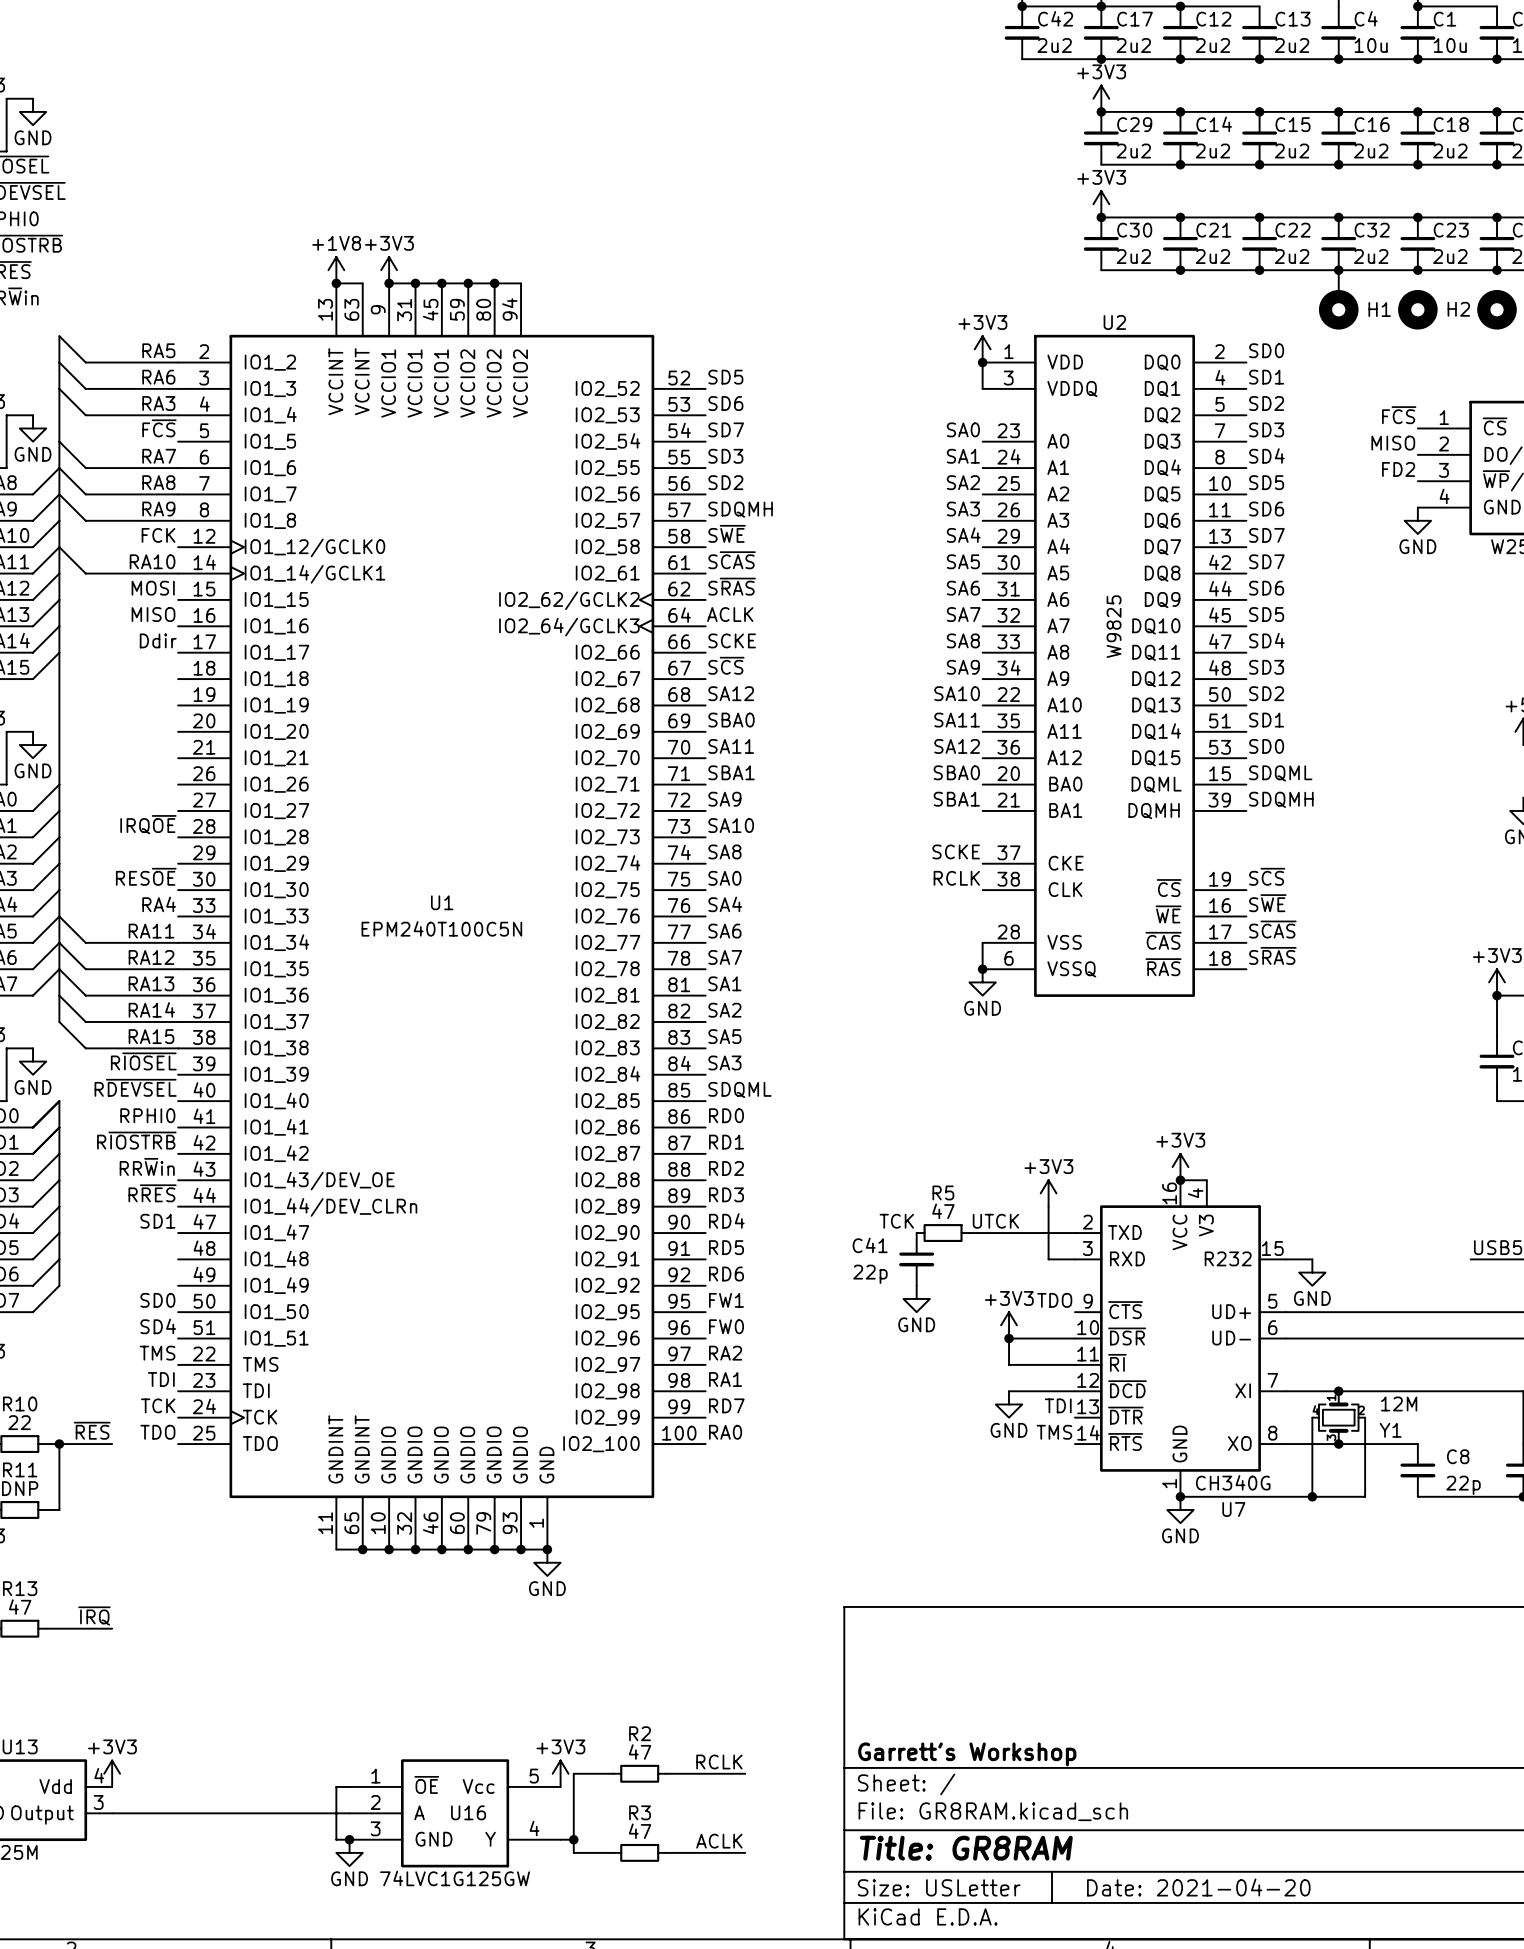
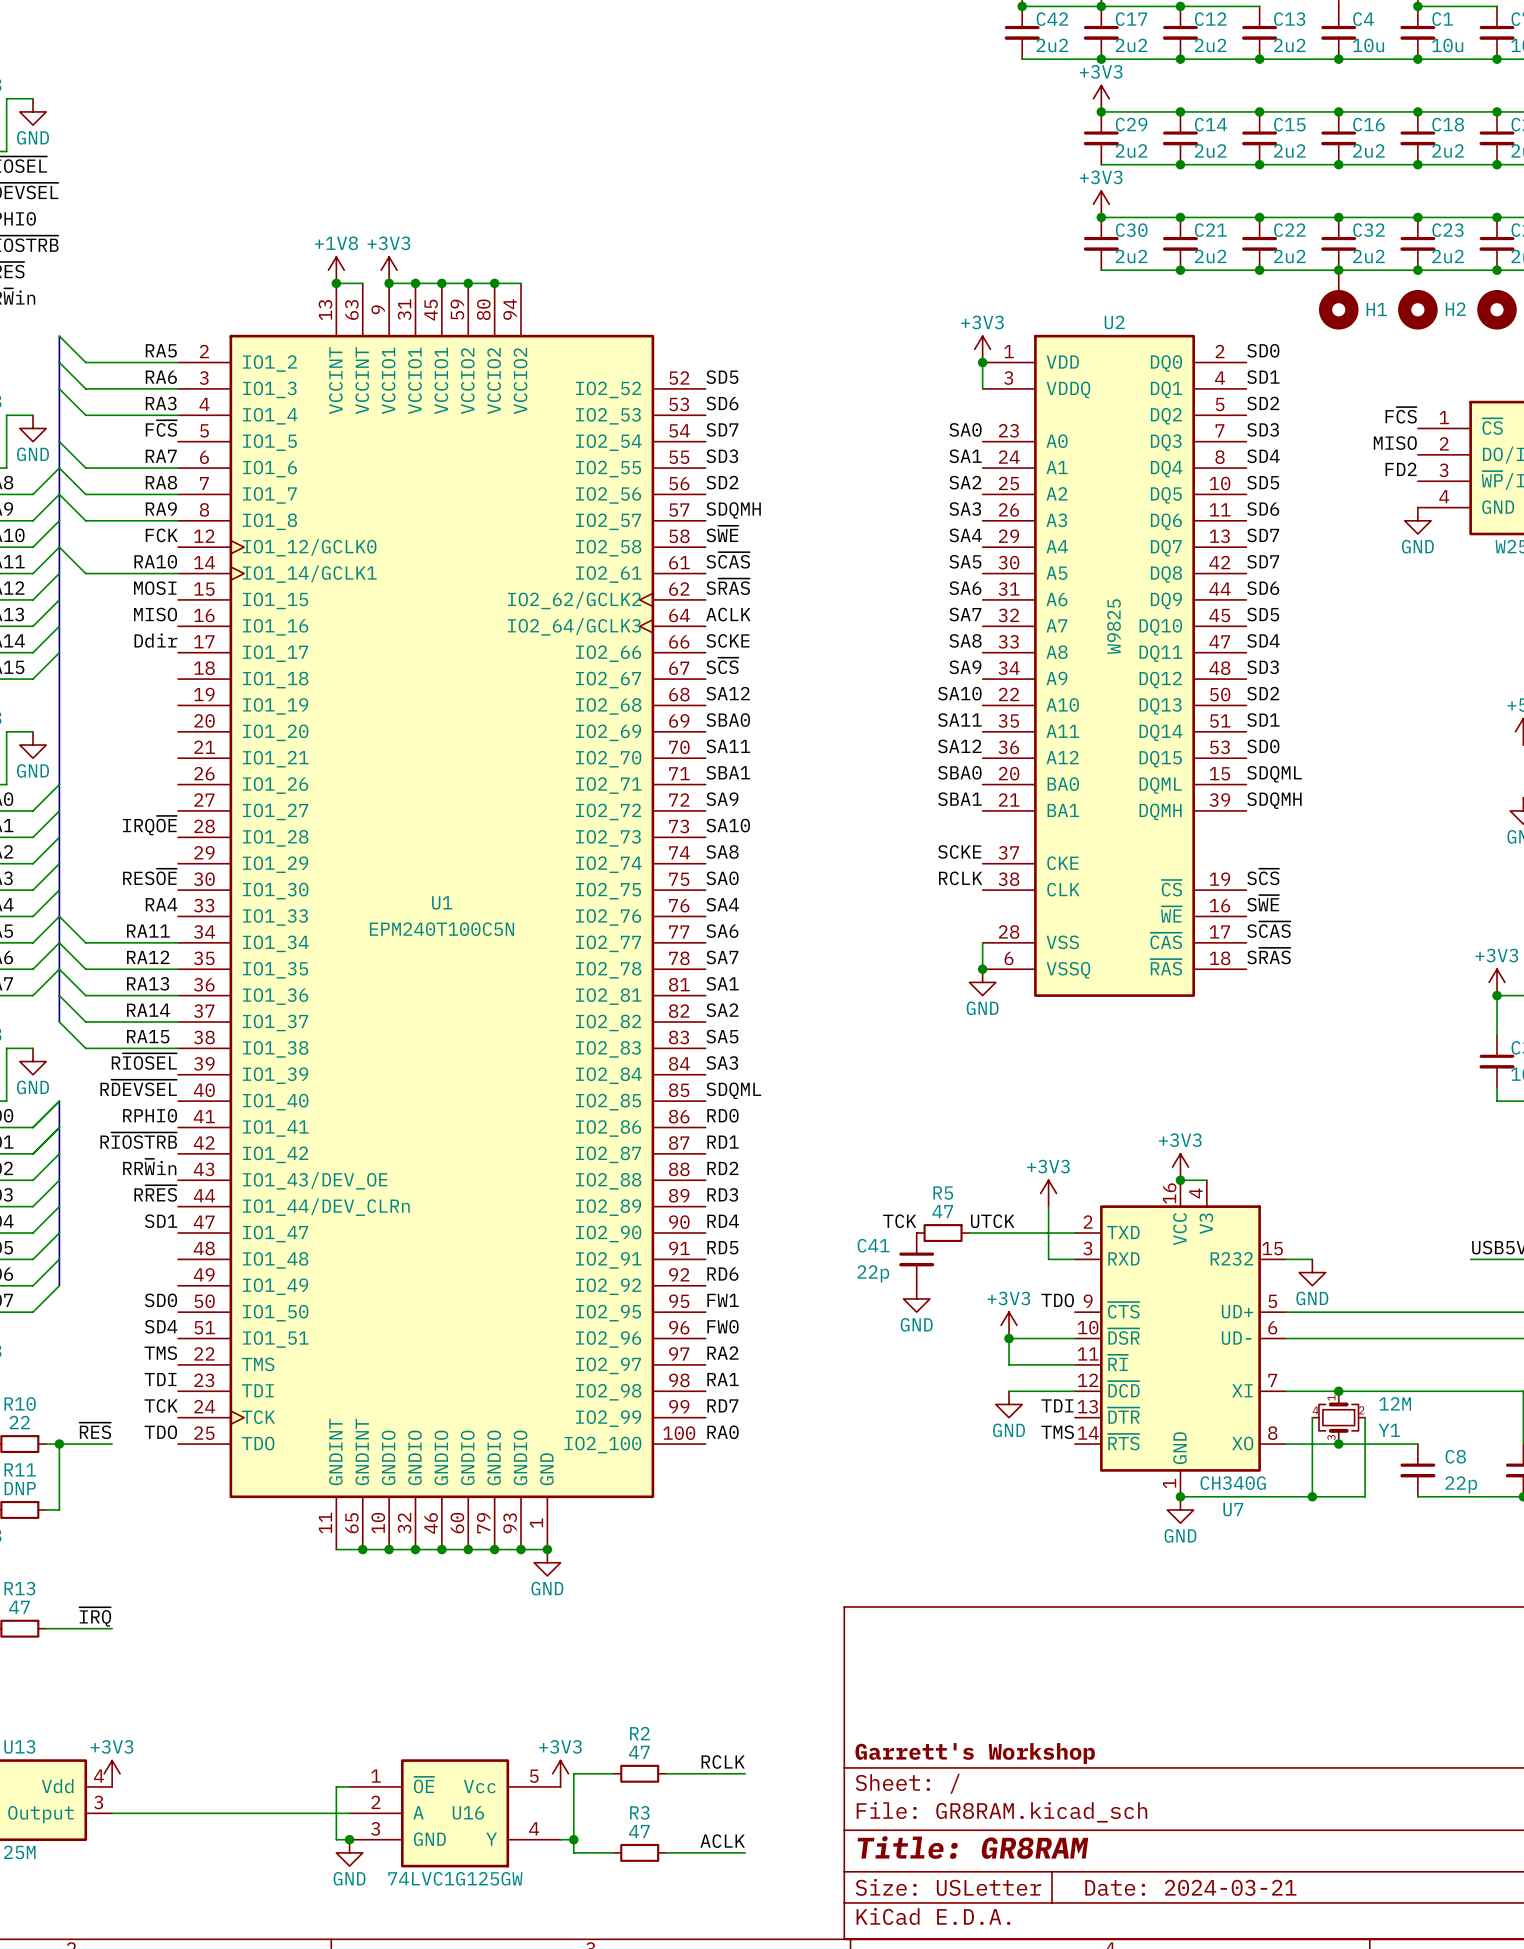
title block: Date: 2021-04-20 (1198, 1887) -> Date: 2024-03-21 (1190, 1887)

